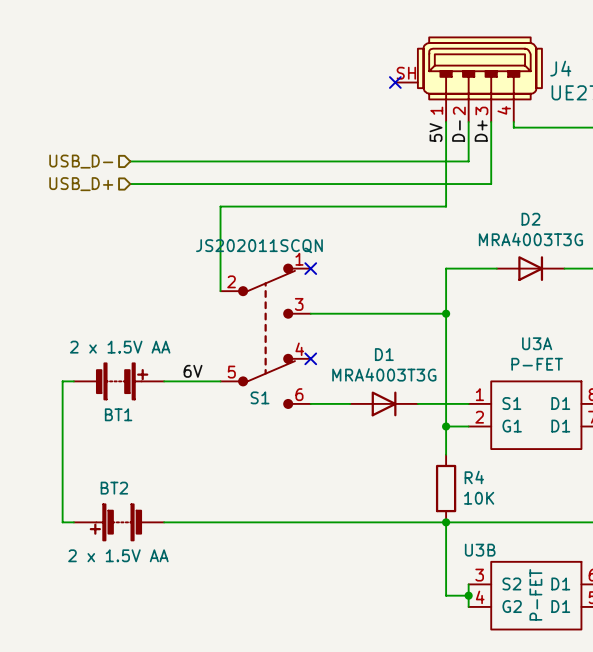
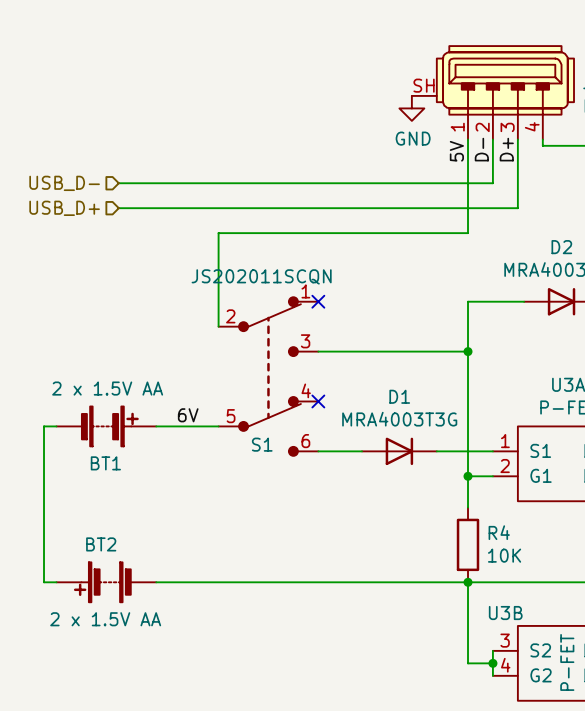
no-connect mark: (395, 82) -> none
power symbol: none -> GND (411, 108)

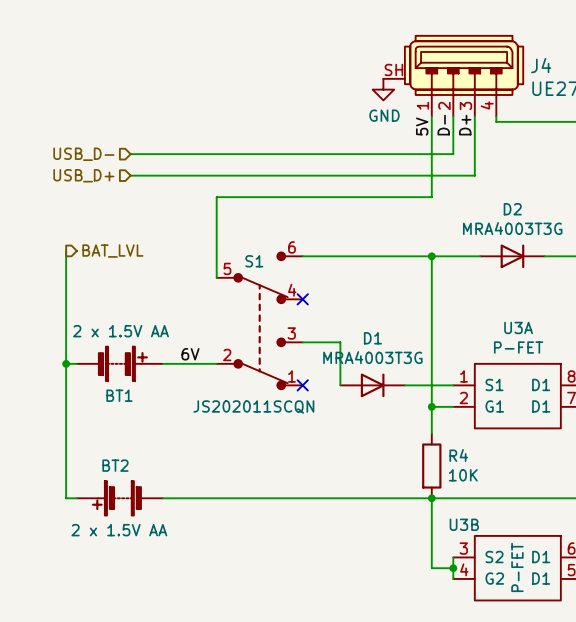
wire: none -> (66, 250) (66, 363)
hierarchical label: none -> BAT_LVL (112, 251)
no-connect mark: (318, 301) -> none
wire: (318, 351) (468, 351) -> (302, 256) (431, 256)
no-connect mark: none -> (302, 299)
junction position: (468, 351) -> (431, 256)
S1 flip: as is (269, 376) -> up-down (261, 320)
no-connect mark: (318, 401) -> none
junction: none -> (66, 363)
wire: (318, 451) (362, 451) -> (302, 342) (340, 342) (340, 385)
no-connect mark: none -> (302, 385)

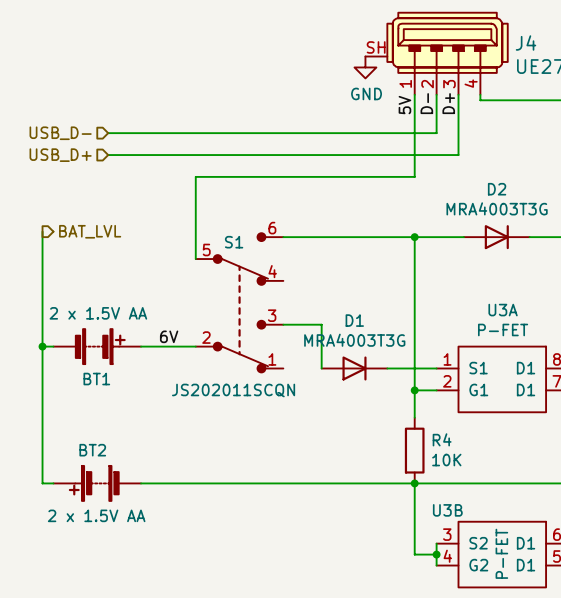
no-connect mark: (302, 299) -> none
no-connect mark: (302, 385) -> none

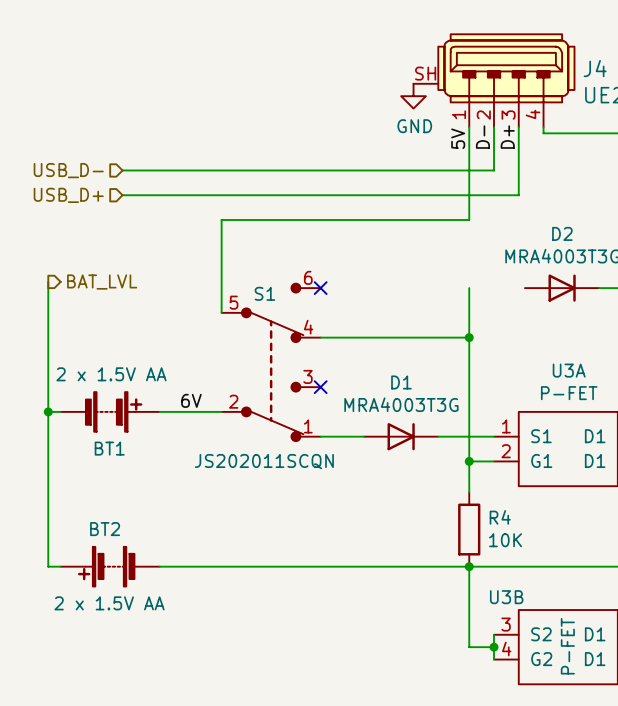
wire: (283, 237) (463, 237) -> none
no-connect mark: none -> (320, 288)
junction position: (414, 237) -> (469, 337)
wire: none -> (320, 337) (469, 337)
wire: (283, 324) (321, 324) (321, 368) -> (320, 436) (364, 436)
no-connect mark: none -> (320, 387)

